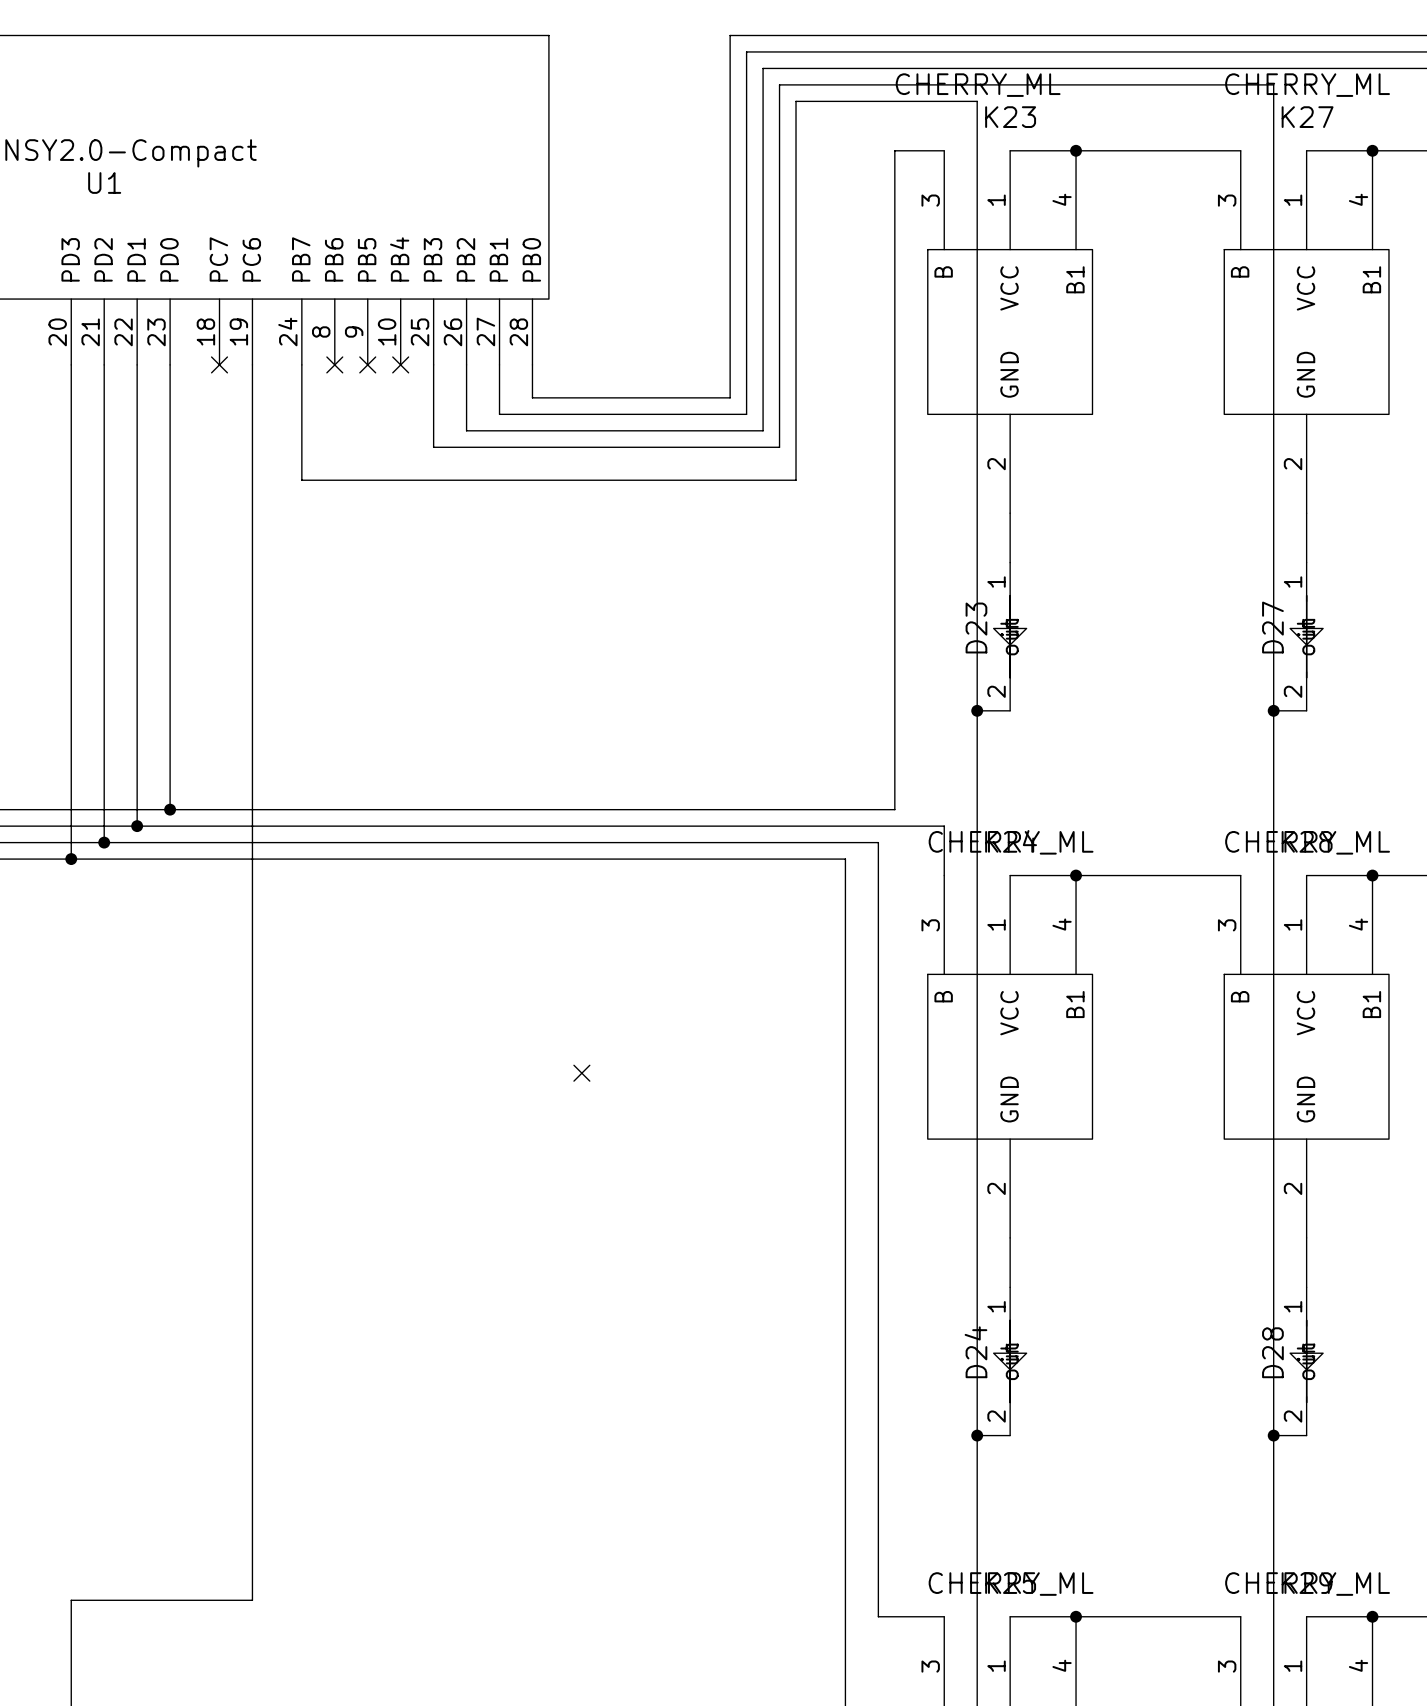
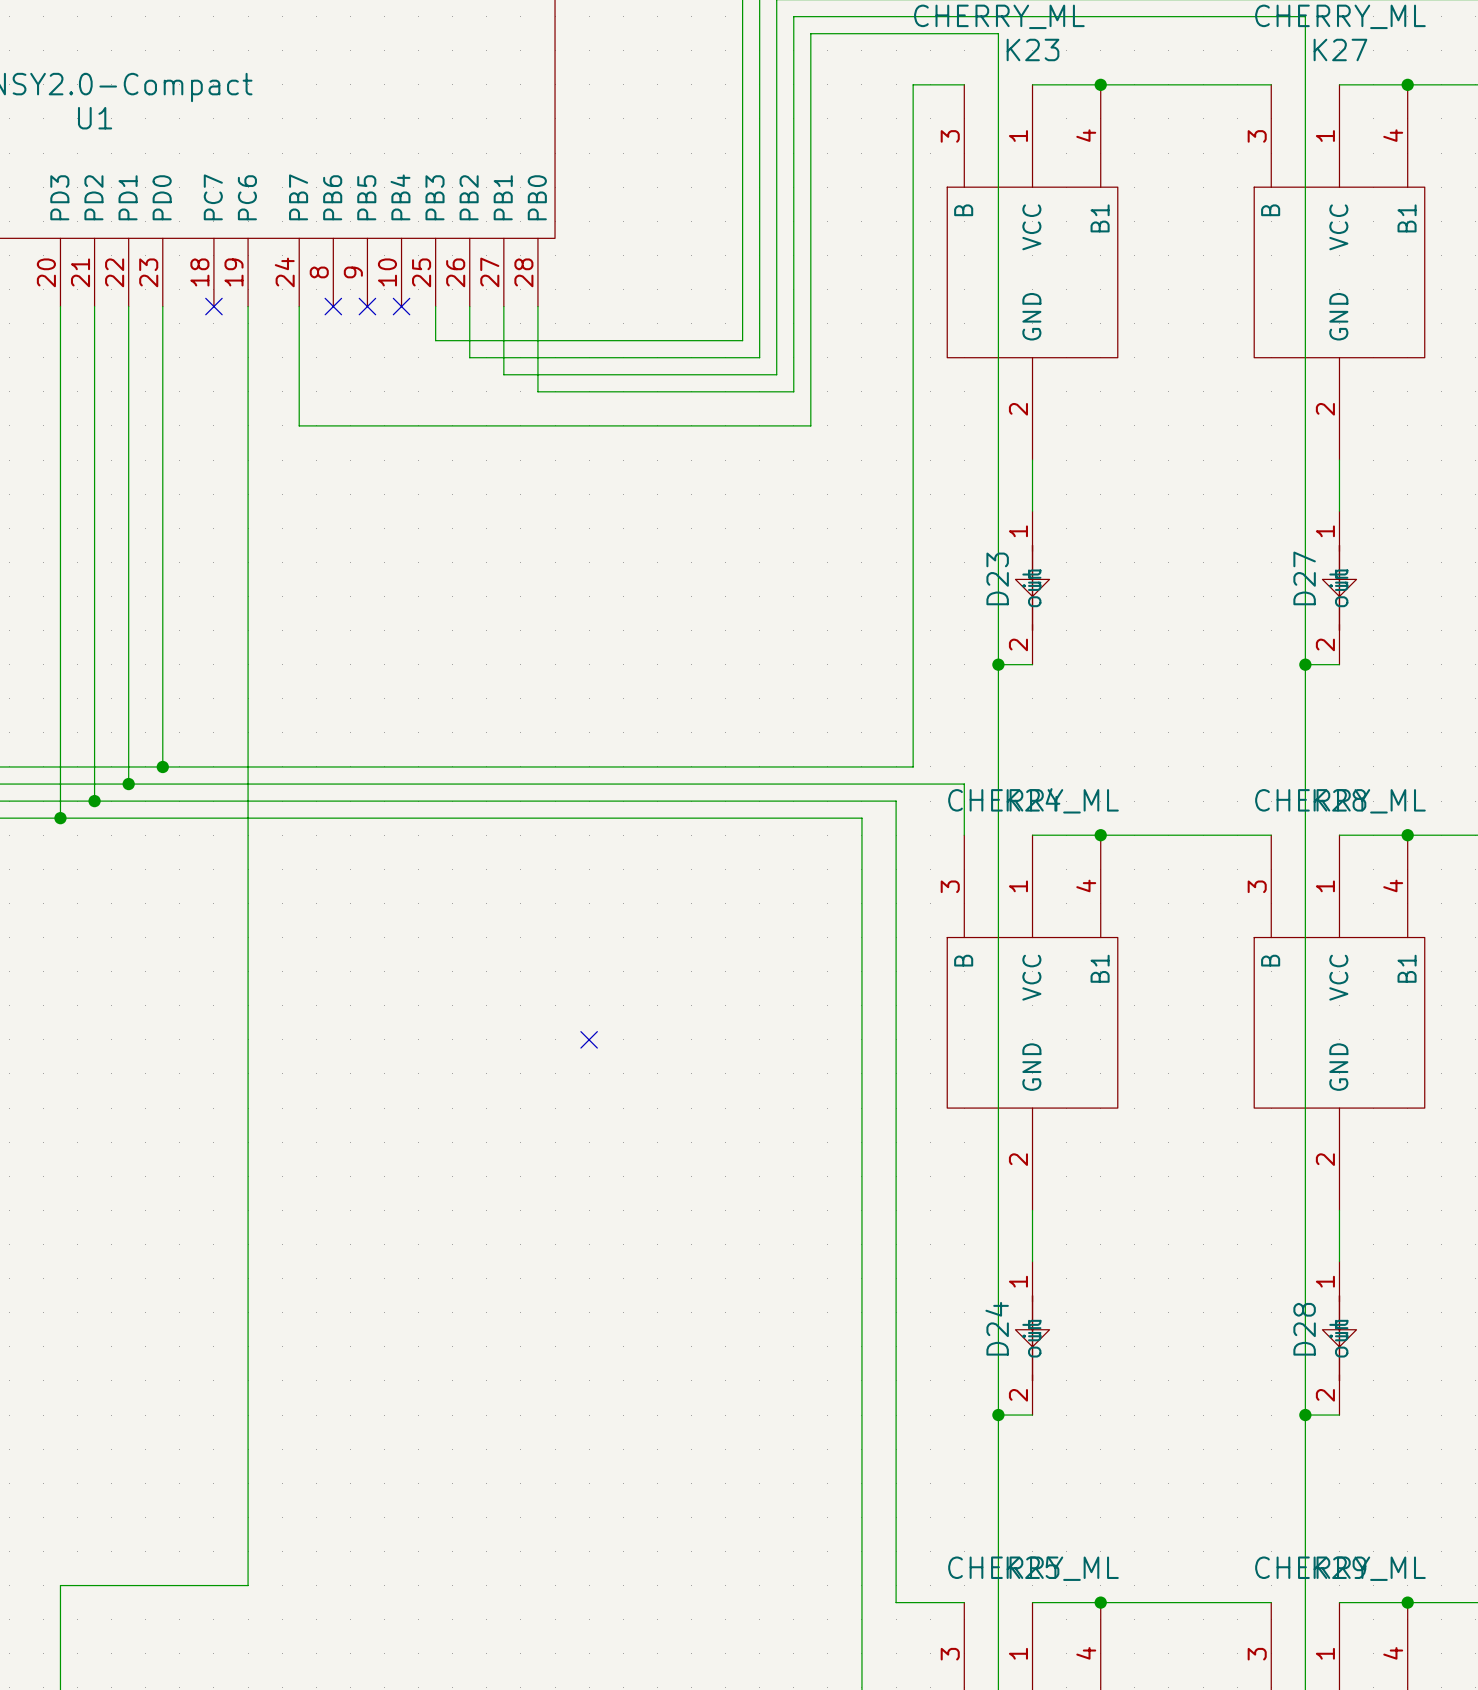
wire: (433, 397) (433, 447) (532, 447) -> (435, 340) (537, 340) (537, 391)
wire: (466, 414) (466, 430) (499, 430) -> (469, 357) (503, 357) (503, 374)

